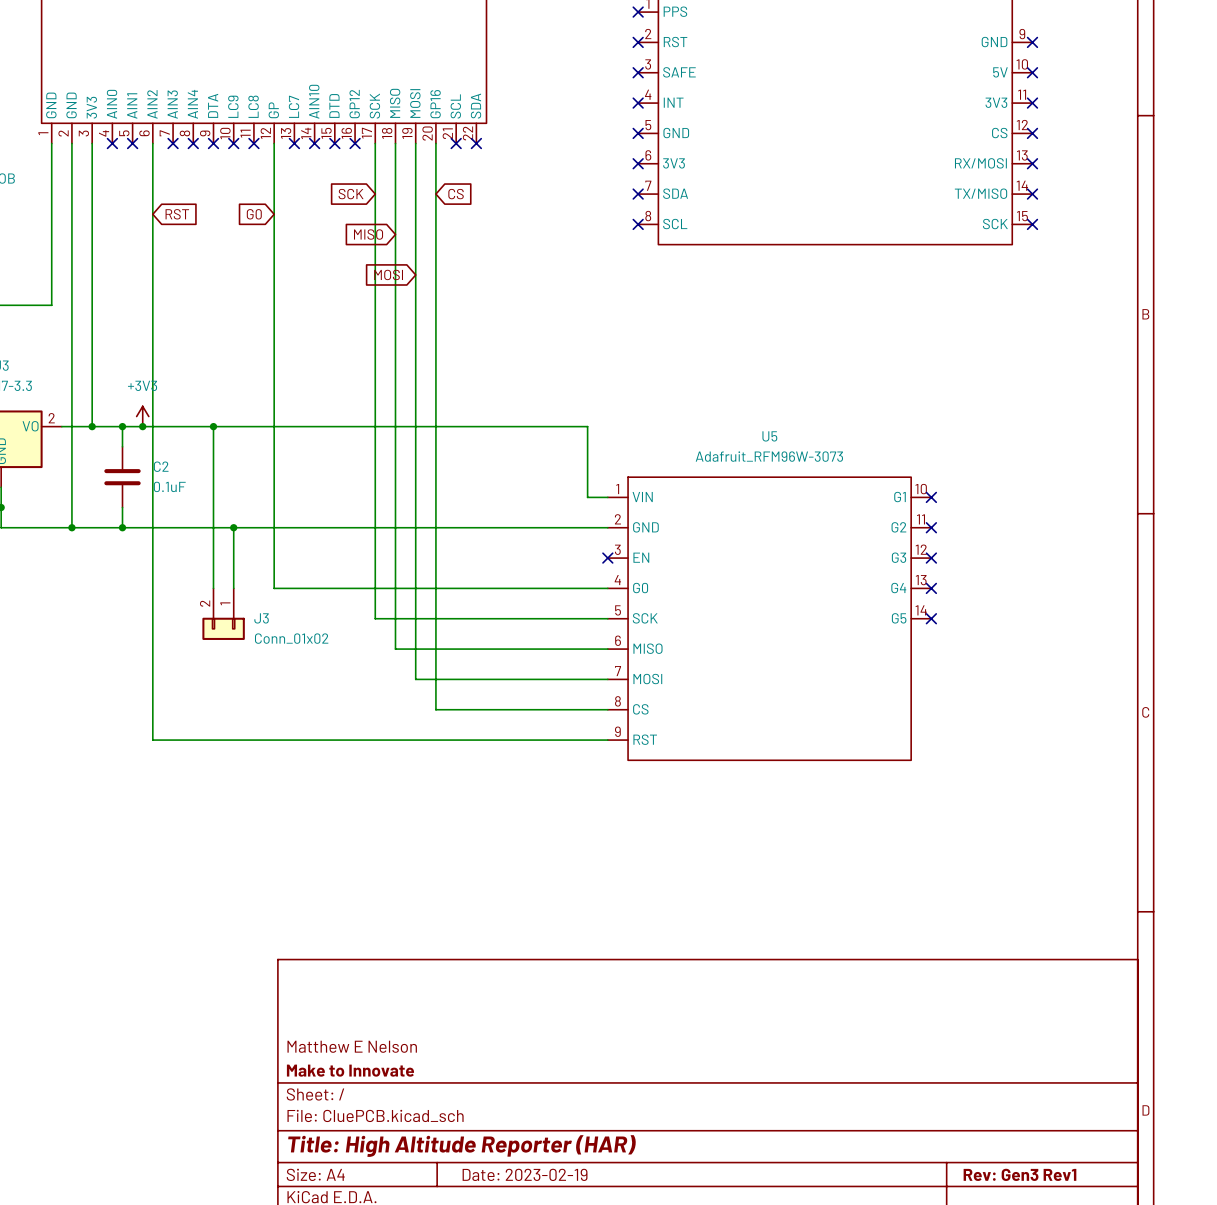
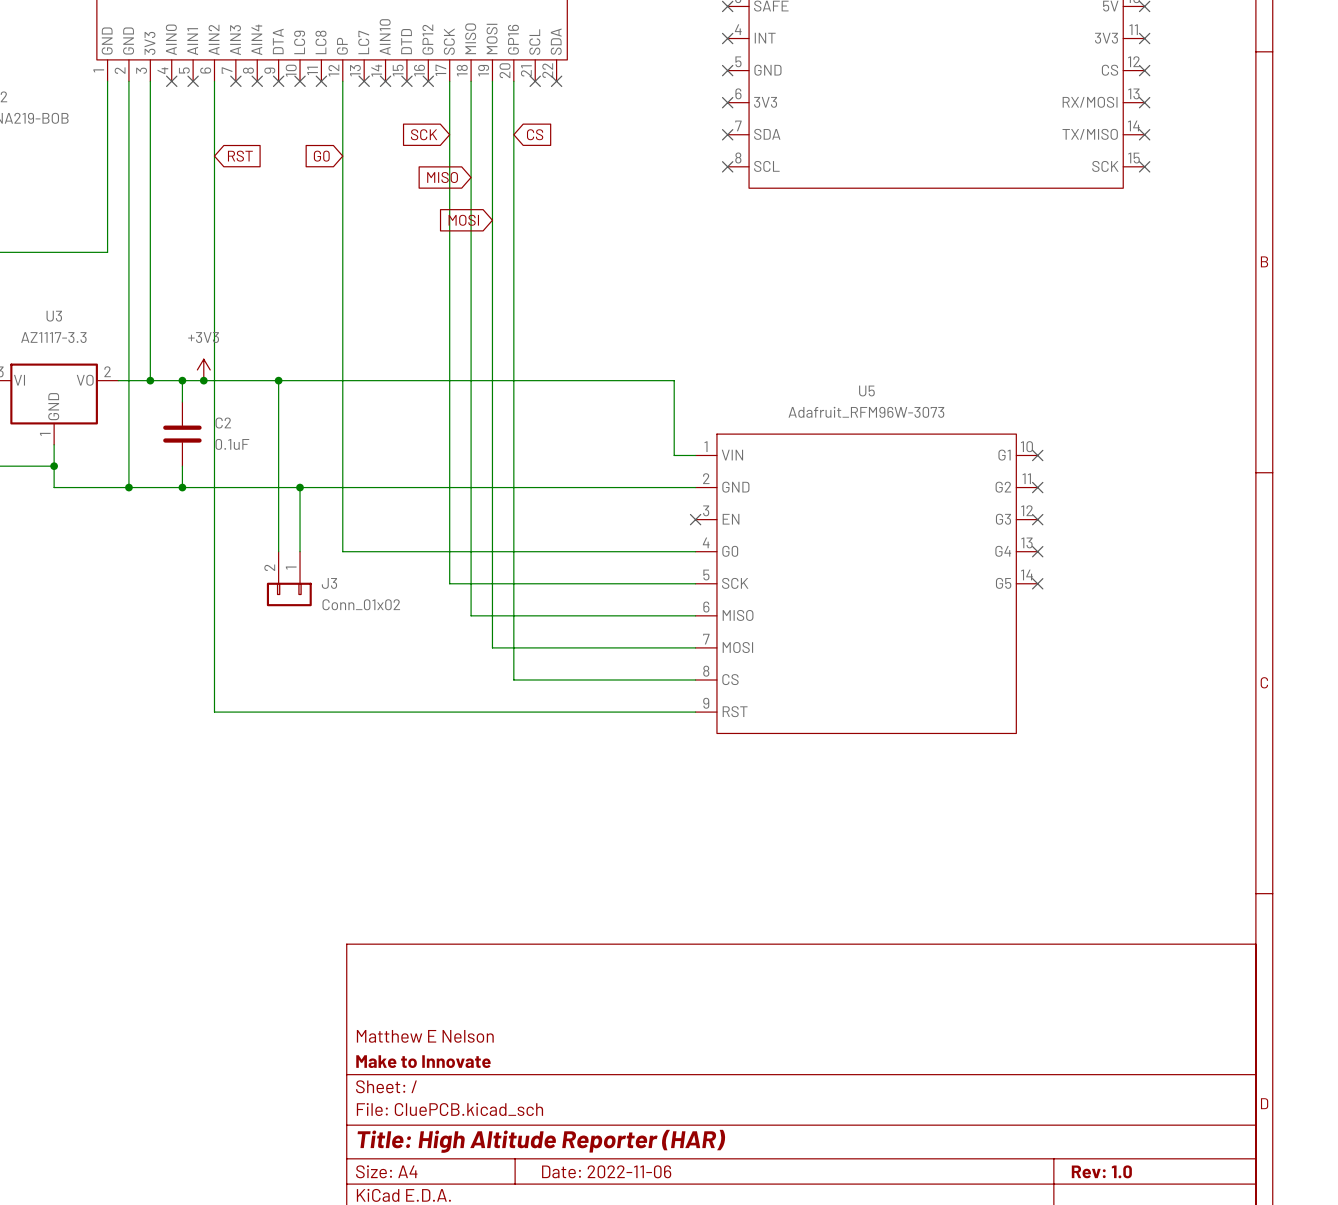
title block: Date: 2023-02-19 (525, 1174) -> Date: 2022-11-06 (606, 1171)
title block: Rev: Gen3 Rev1 (1019, 1174) -> Rev: 1.0 (1101, 1171)

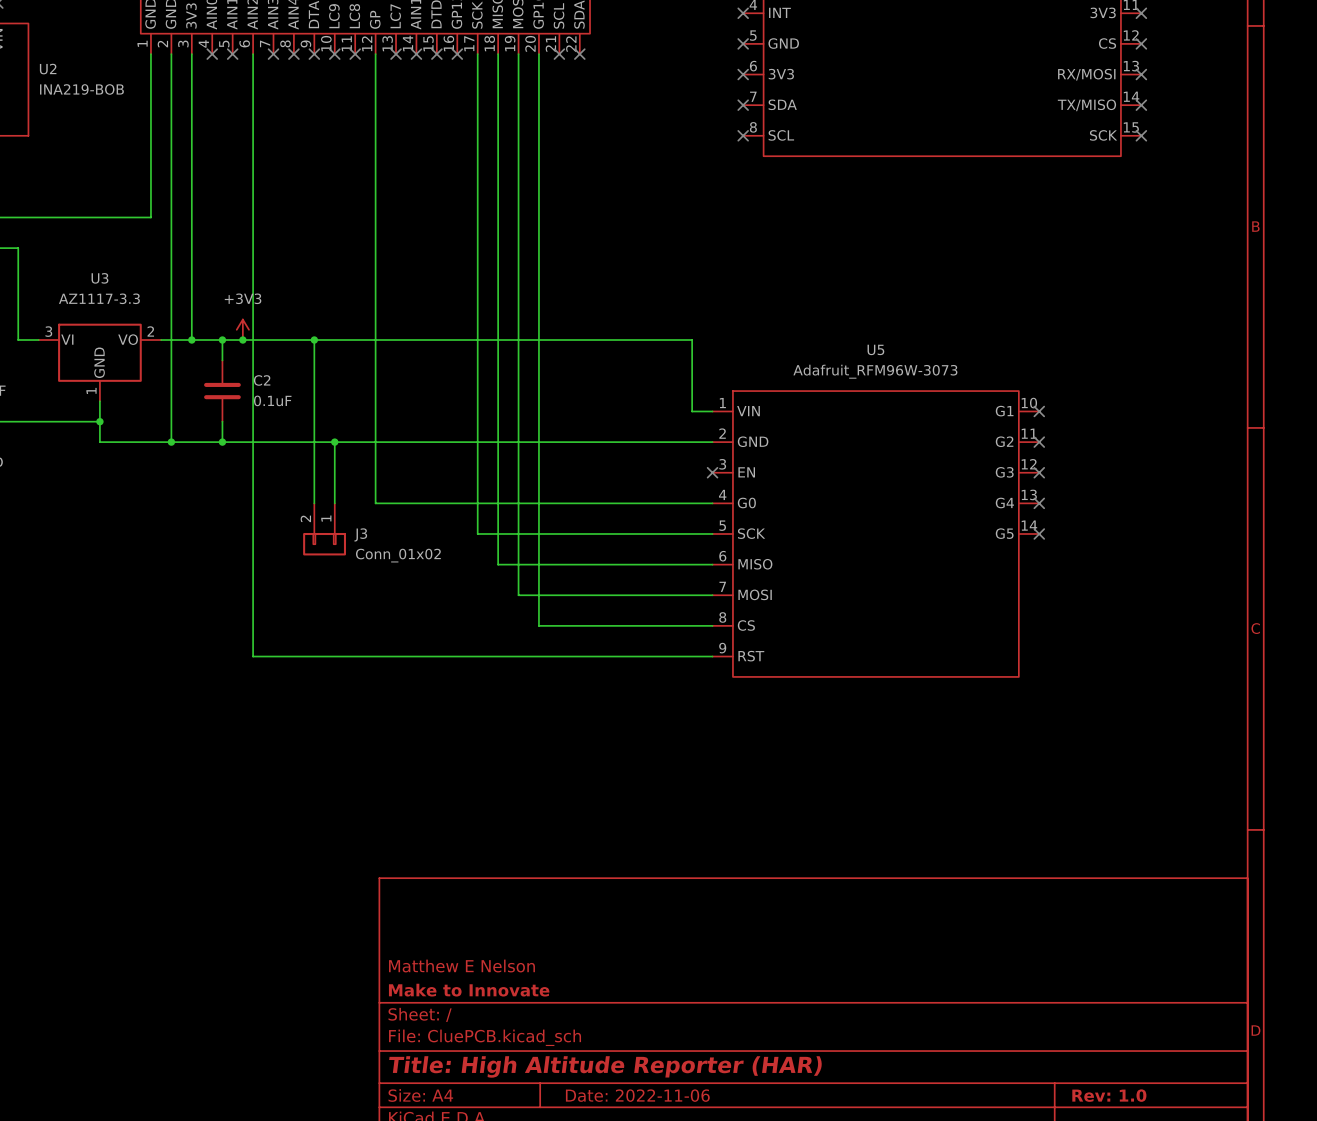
global label: SCK (424, 134) -> none
global label: CS (535, 134) -> none
global label: RST (240, 156) -> none
global label: G0 (321, 156) -> none
global label: MISO (442, 177) -> none
global label: MOSI (463, 220) -> none

